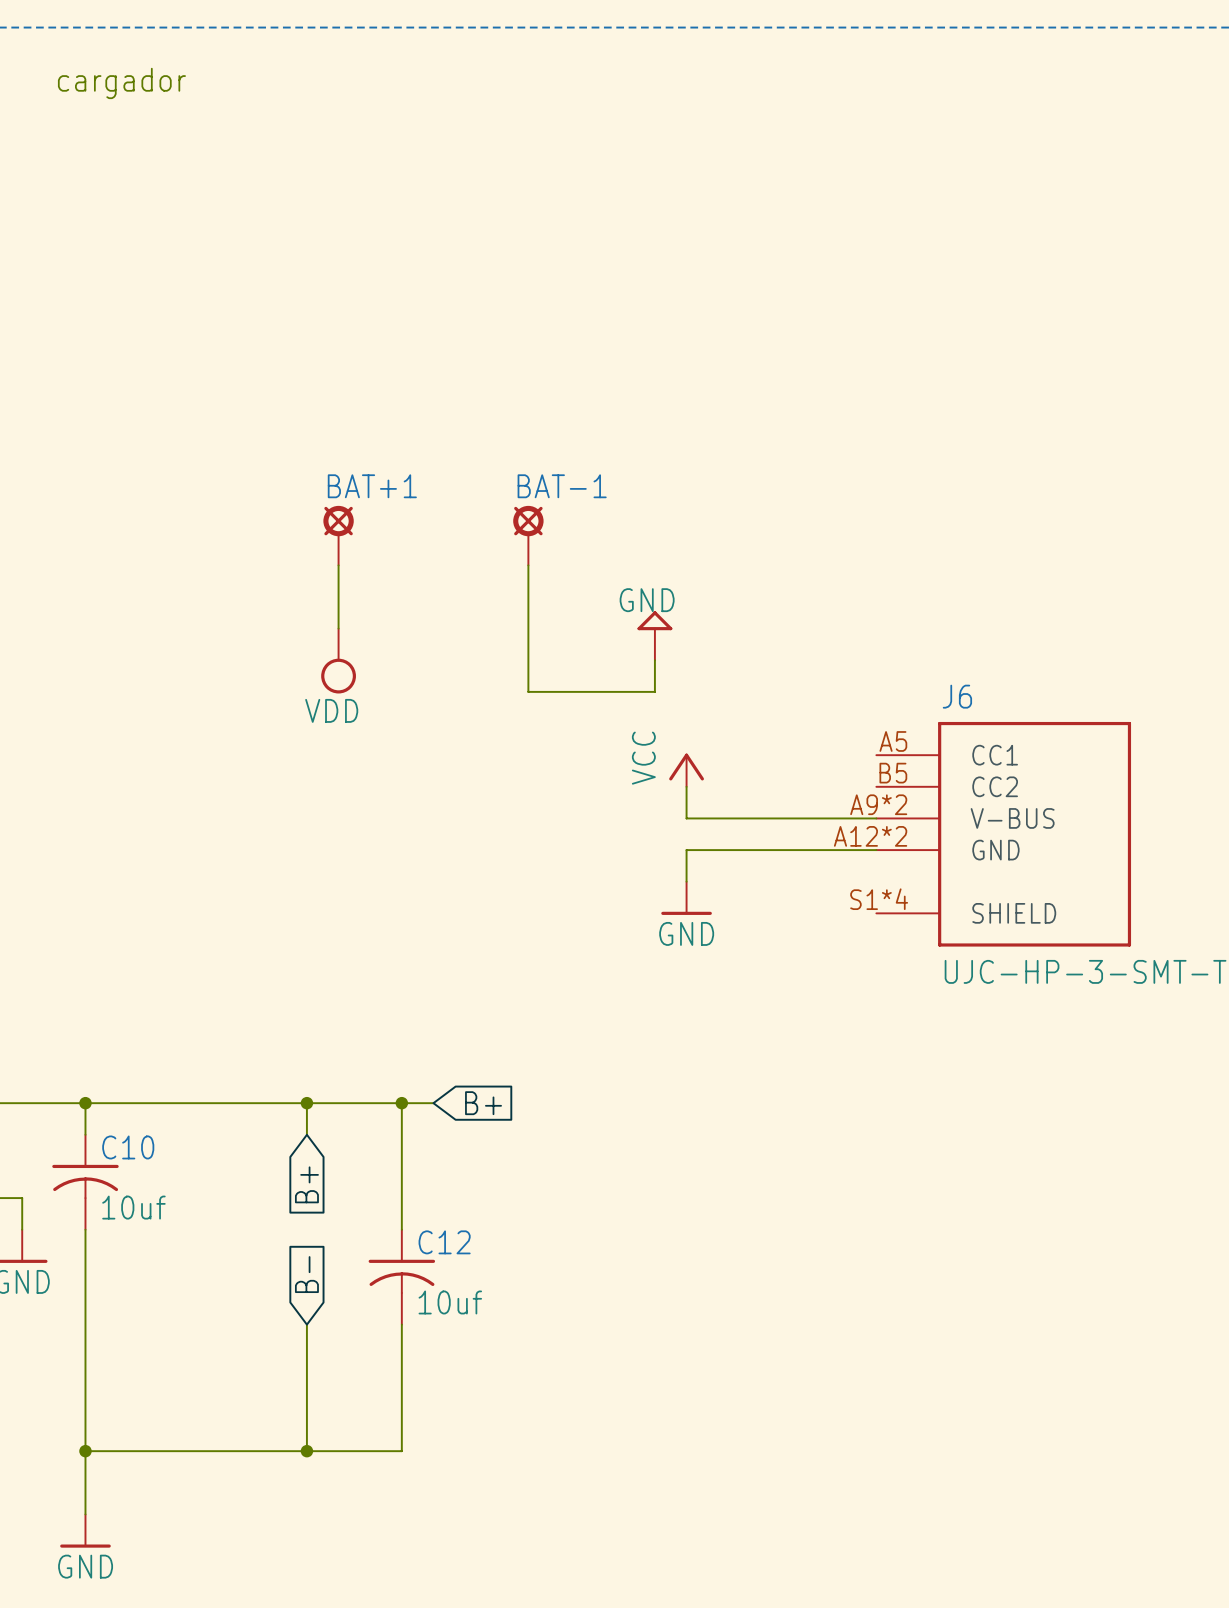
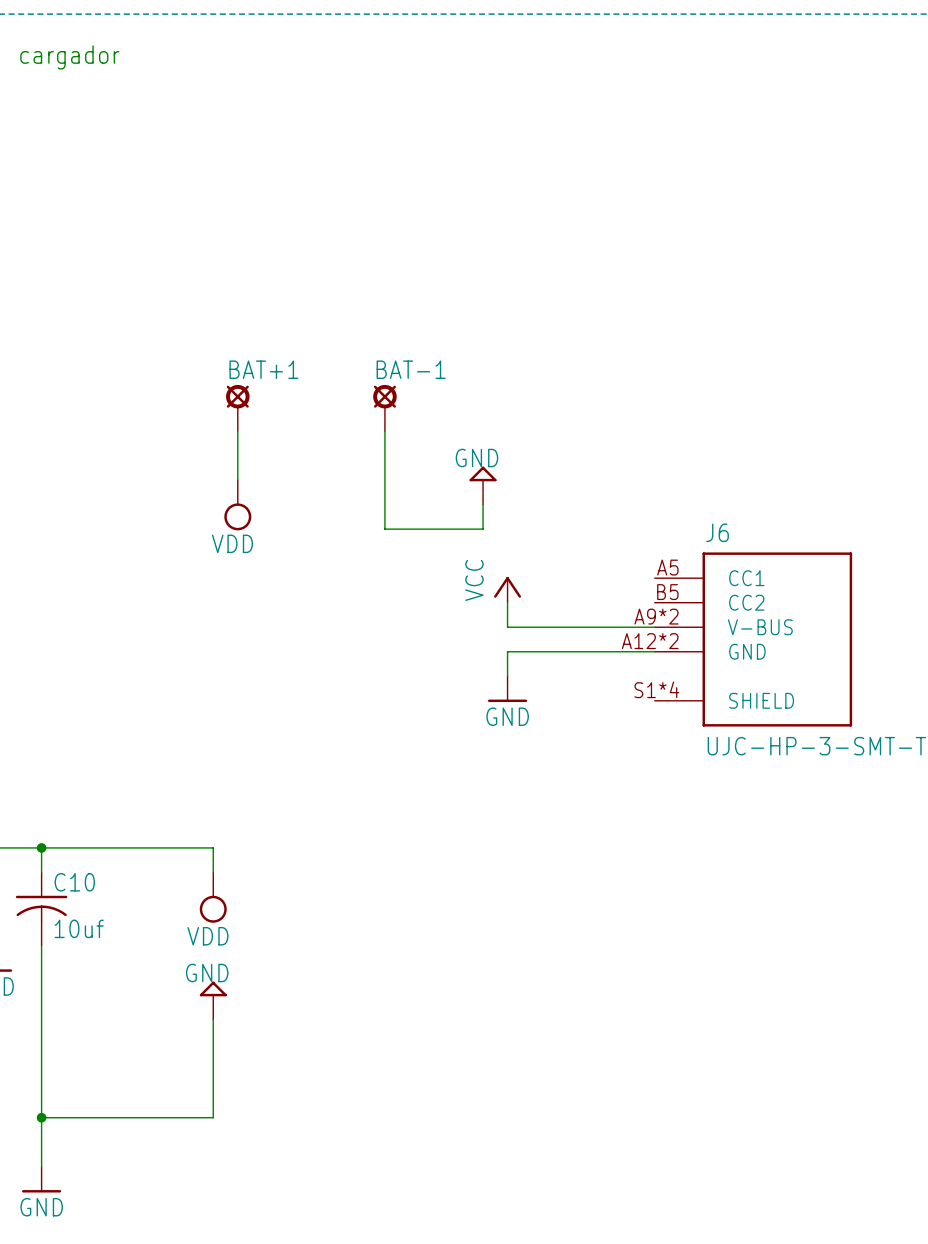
wire: (306, 1103) (433, 1103) -> none
junction: (306, 1103) -> none
wire: (401, 1103) (401, 1229) -> none
junction: (401, 1103) -> none
global label: B+ (483, 1103) -> none
power symbol: none -> VDD (213, 897)
global label: B+ (306, 1184) -> none
global label: B- (306, 1274) -> none
C12: 10uf (401, 1277) -> none
power symbol: none -> GND (213, 1000)
wire: (401, 1324) (401, 1451) (306, 1451) -> none
junction: (306, 1451) -> none

